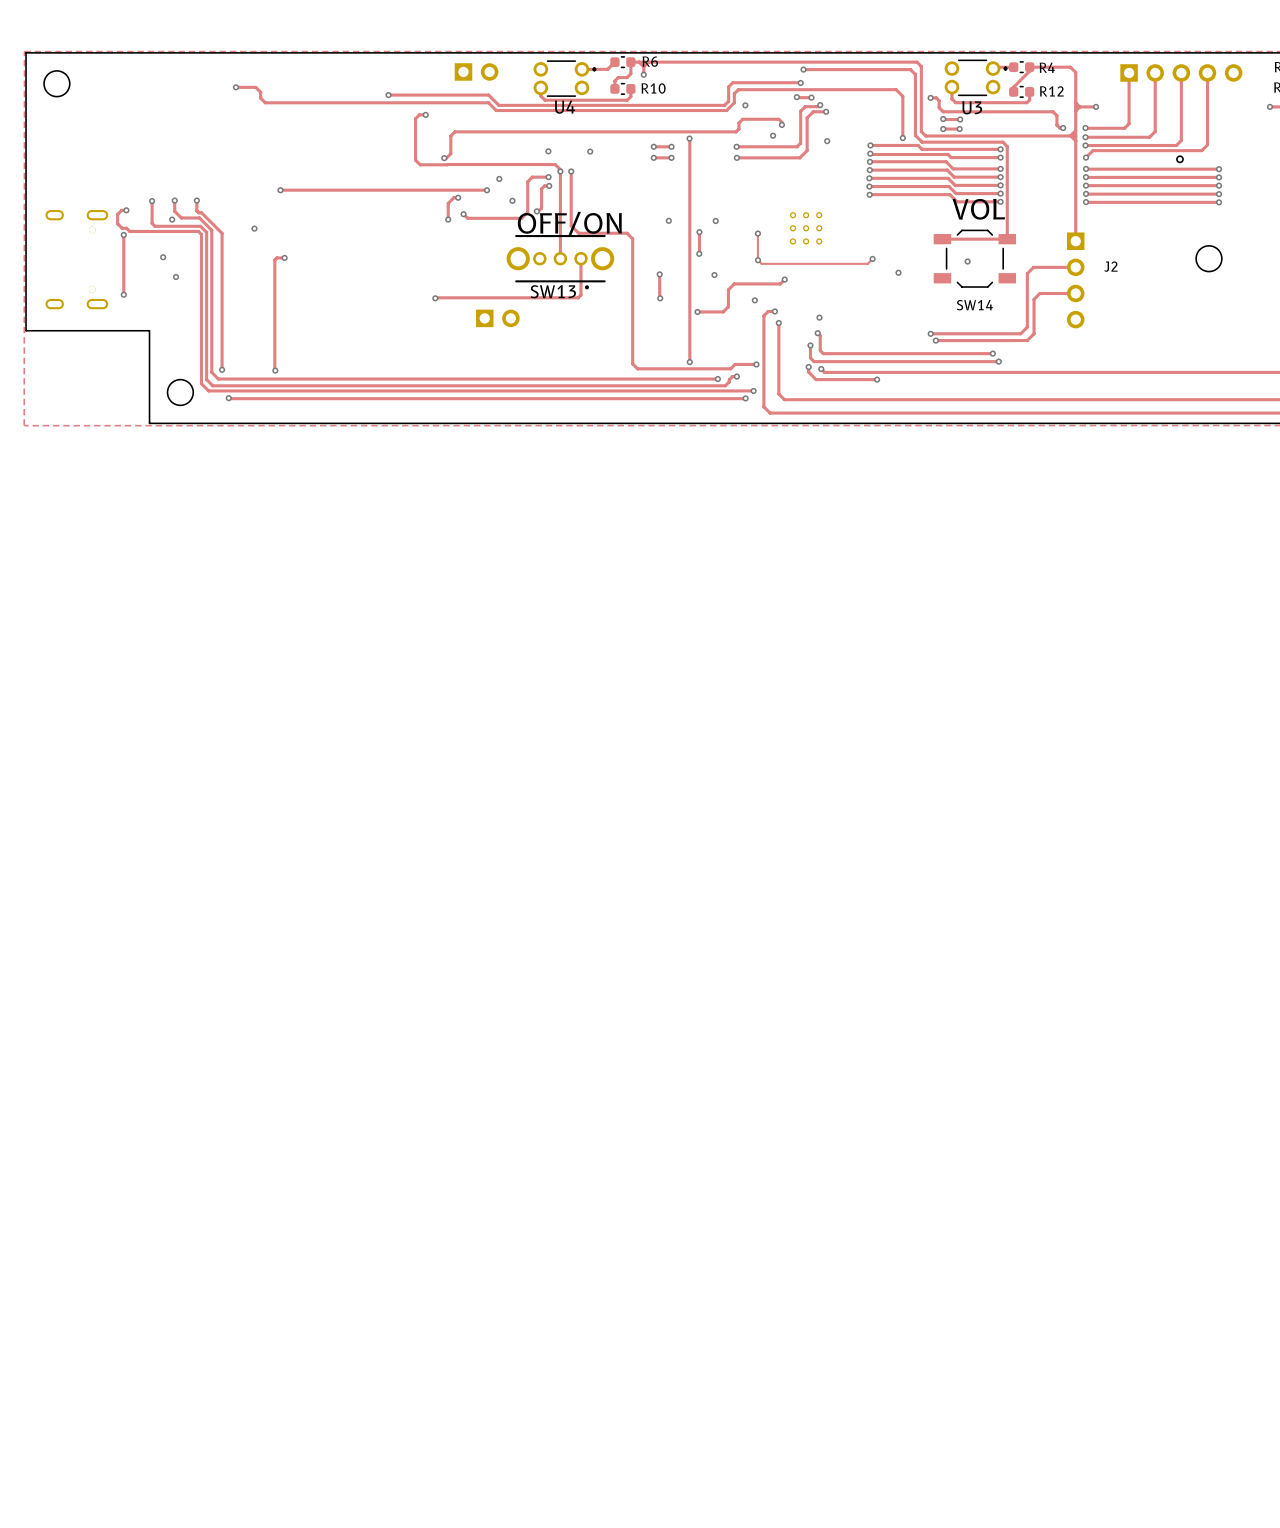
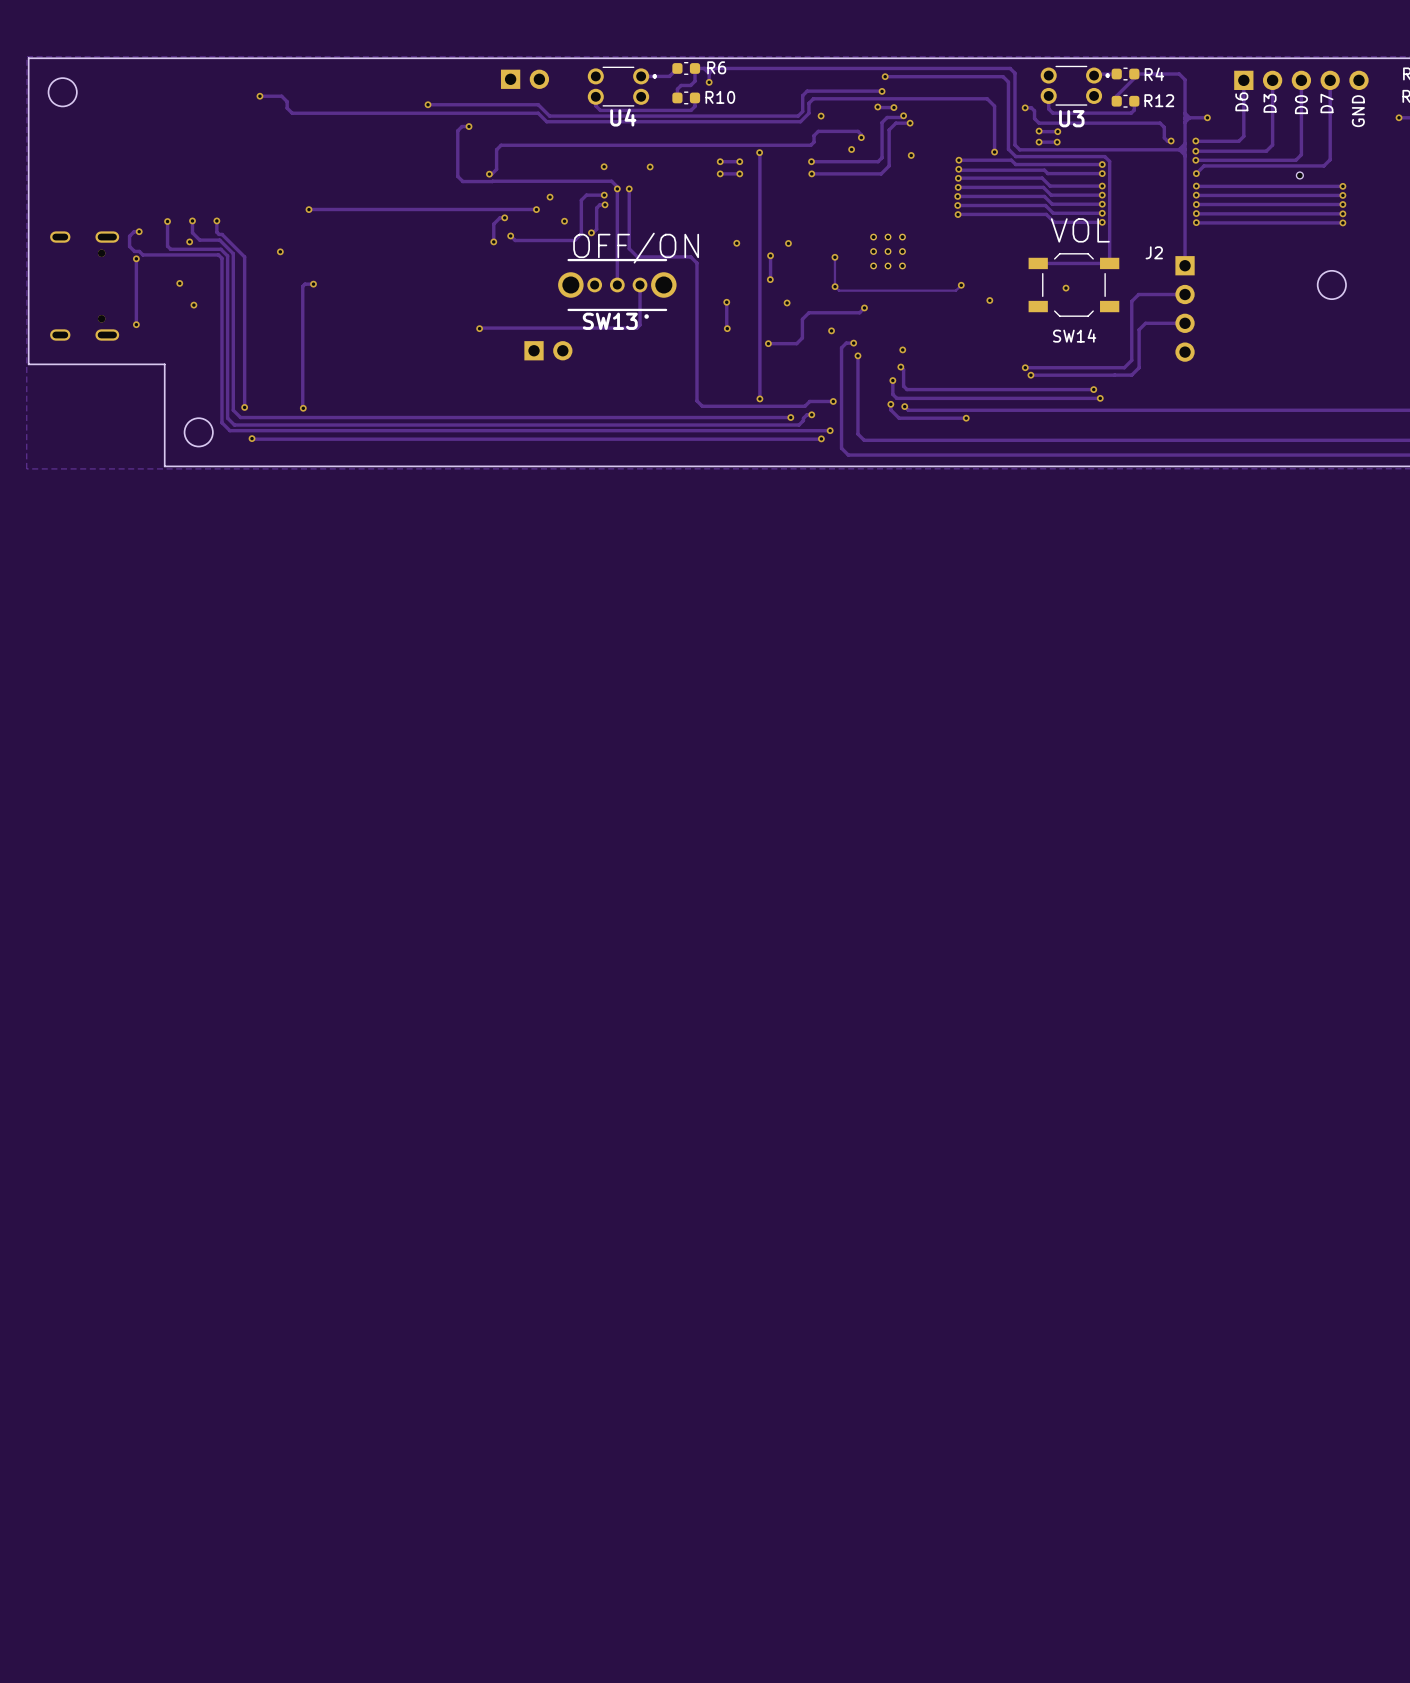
text: none -> D6 (1241, 101)
text: none -> D3 (1270, 103)
text: none -> D7 (1326, 103)
text: none -> D0 (1301, 104)
text: none -> GND (1358, 111)
J2 name position: J2 (1110, 266) -> J2 (1154, 252)

